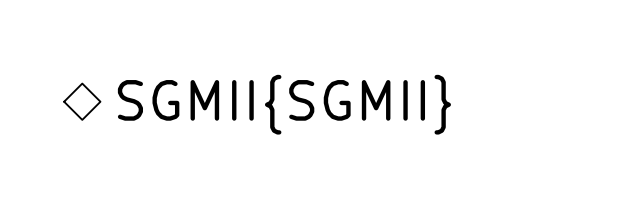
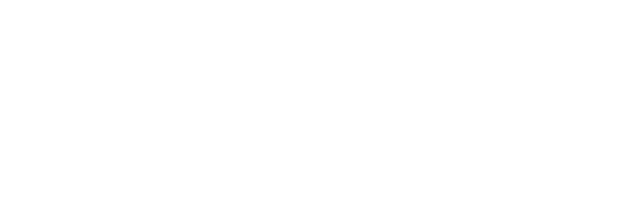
hierarchical label: SGMII{SGMII} (284, 104) -> none

